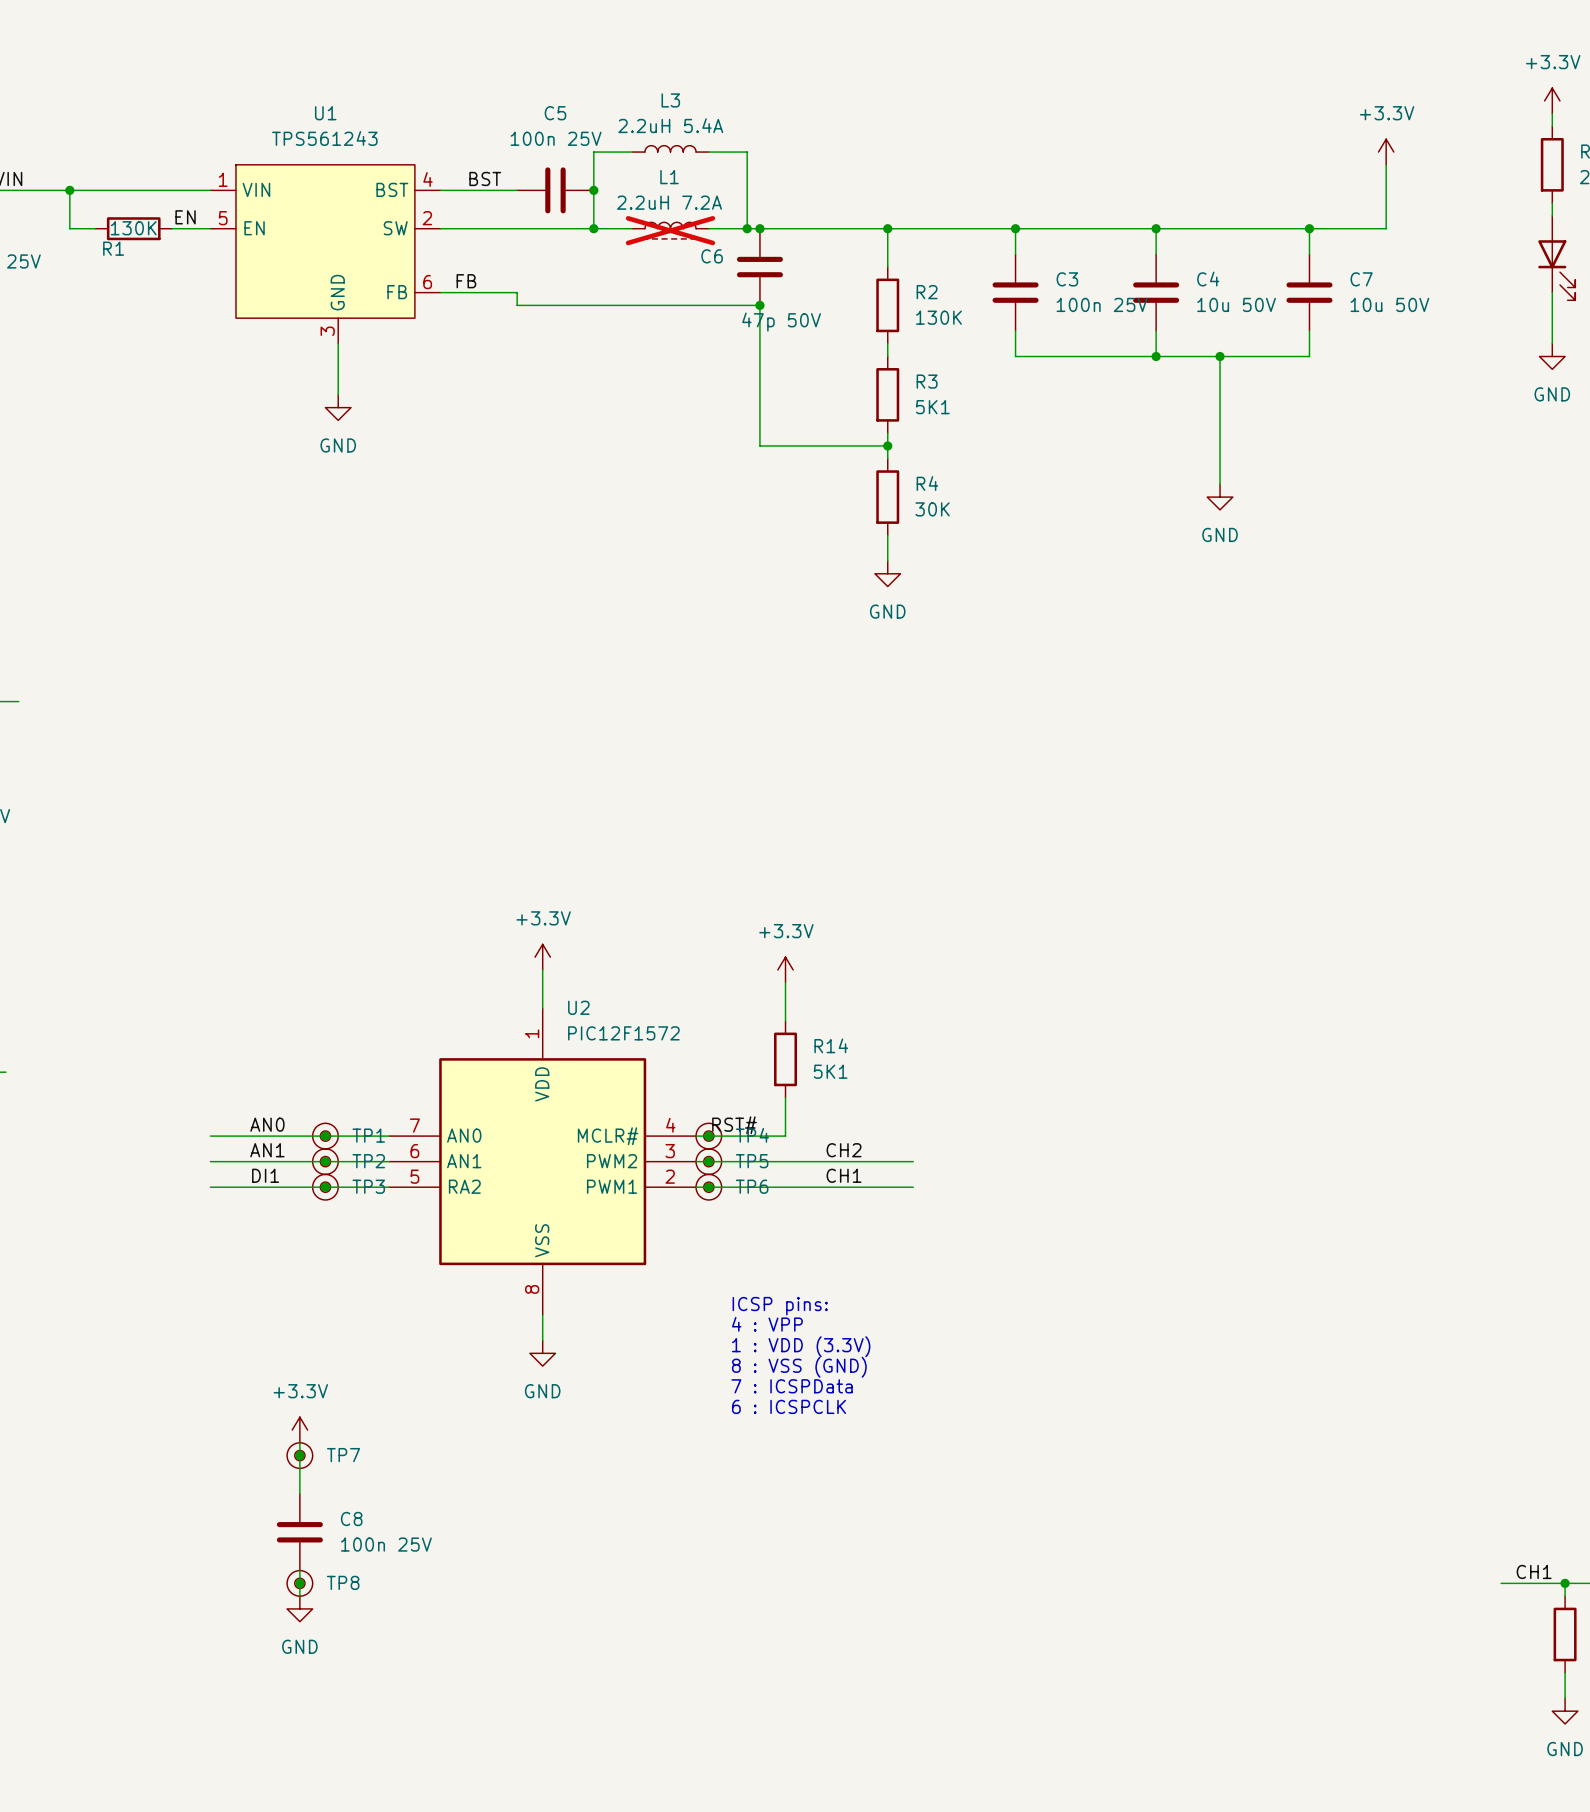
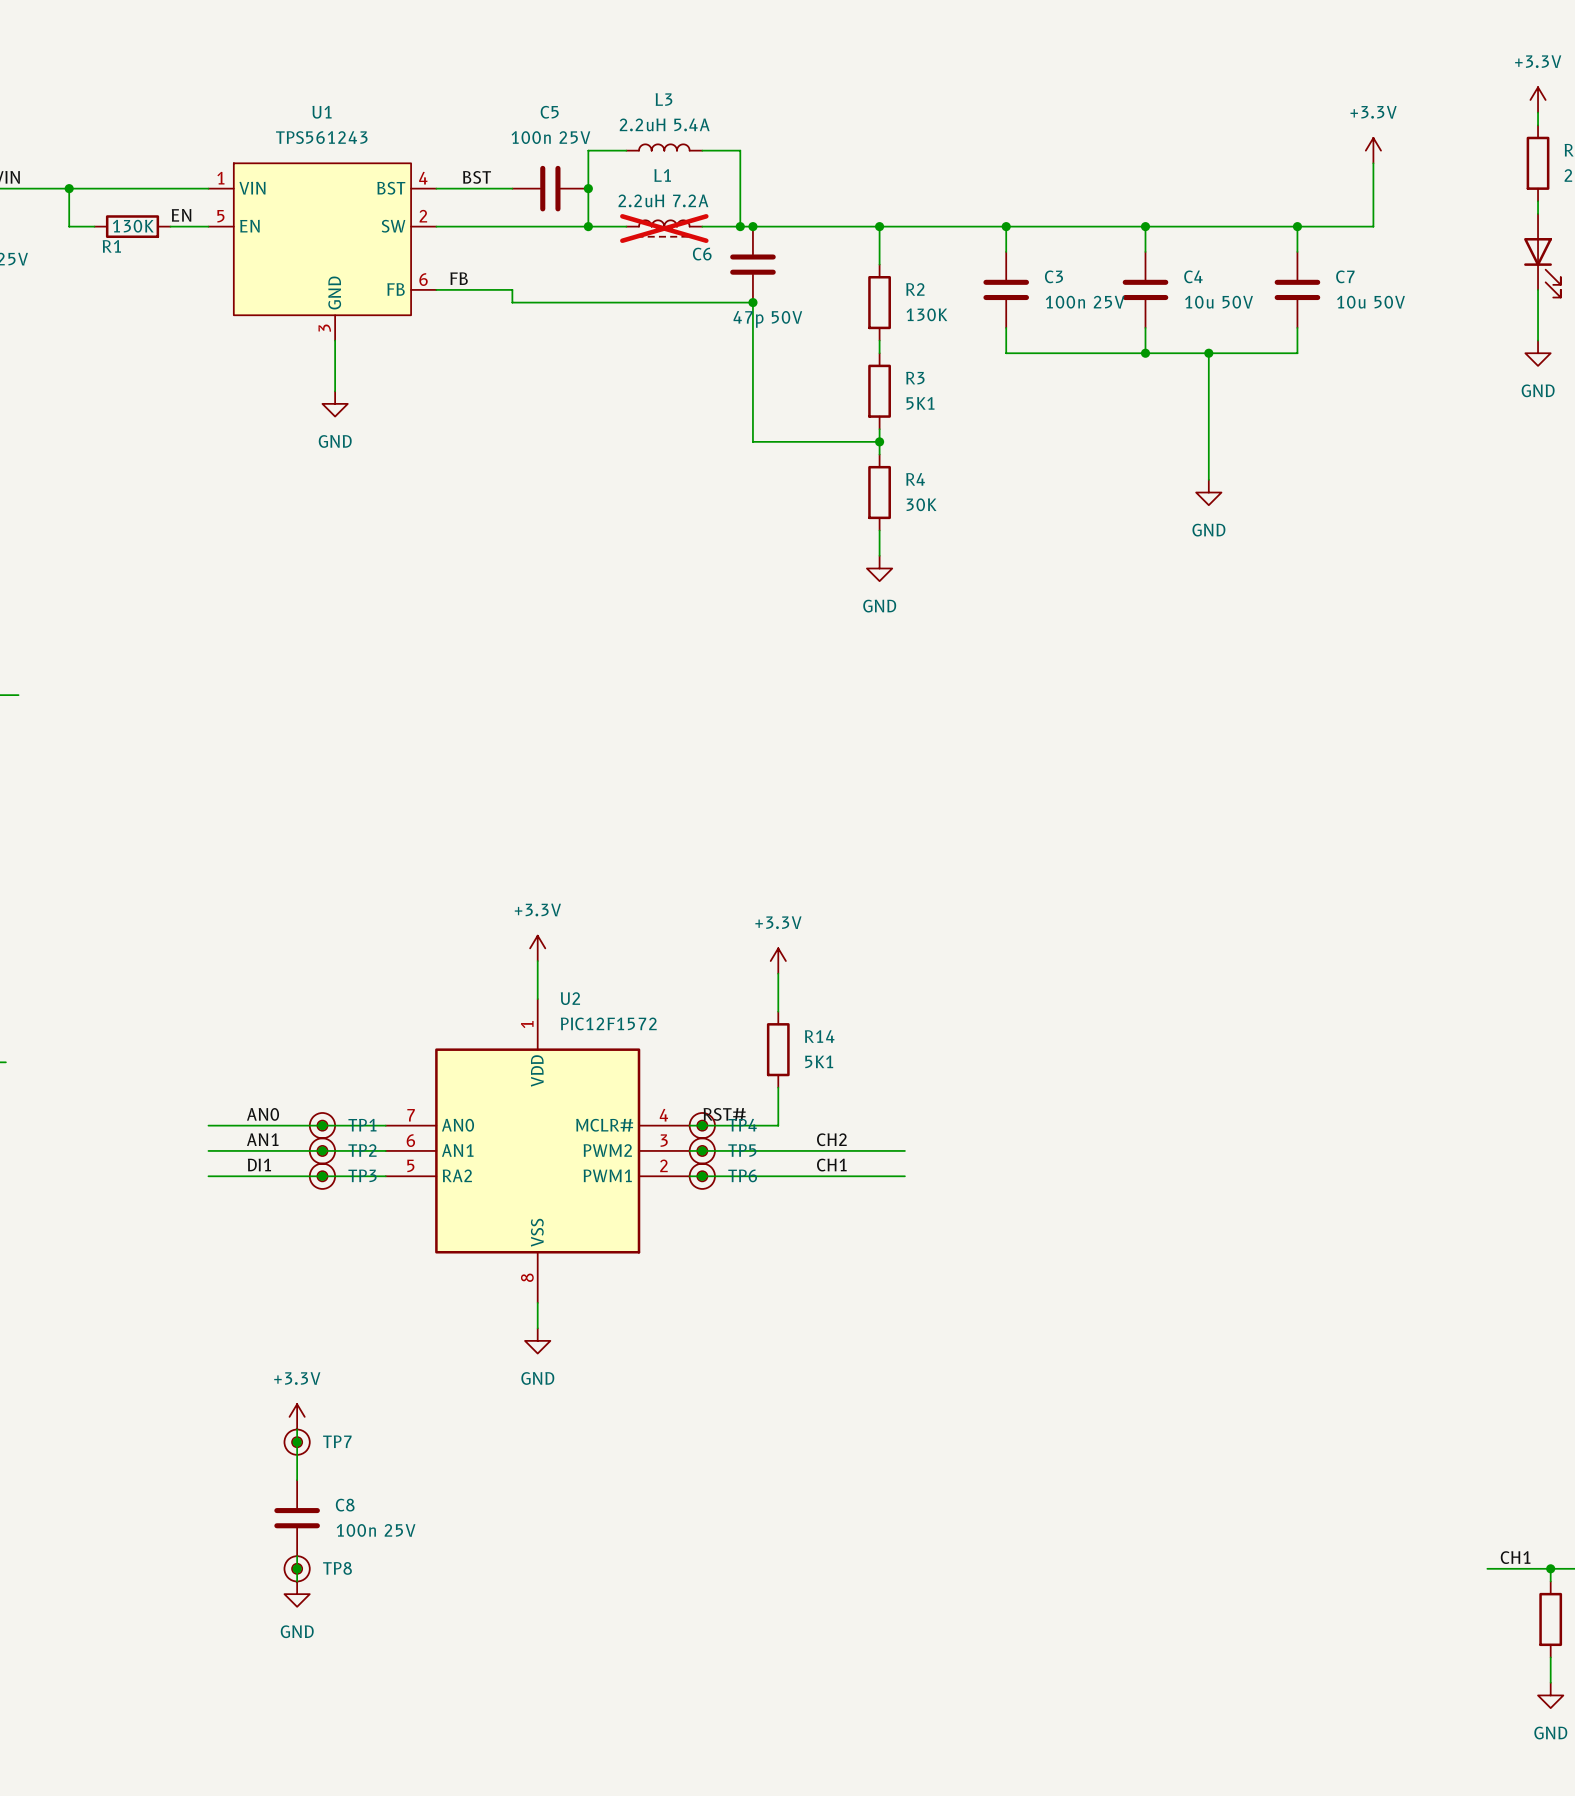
text: ICSP pins: (780, 1306) -> none
text: 4 : VPP (767, 1324) -> none
text: 1 : VDD (3.3V) (801, 1346) -> none
text: 8 : VSS (GND) (799, 1367) -> none
text: 7 : ICSPData (792, 1386) -> none
text: 6 : ICSPCLK (789, 1406) -> none

